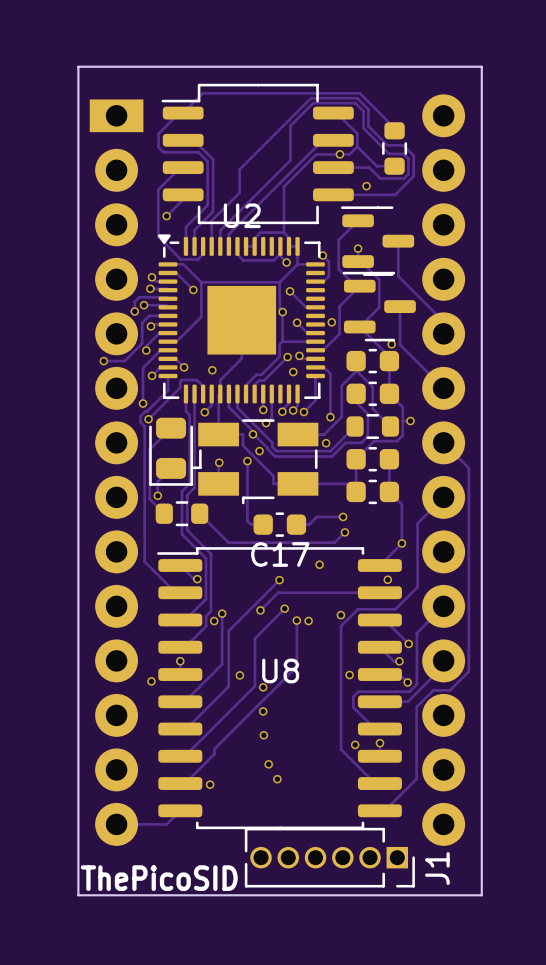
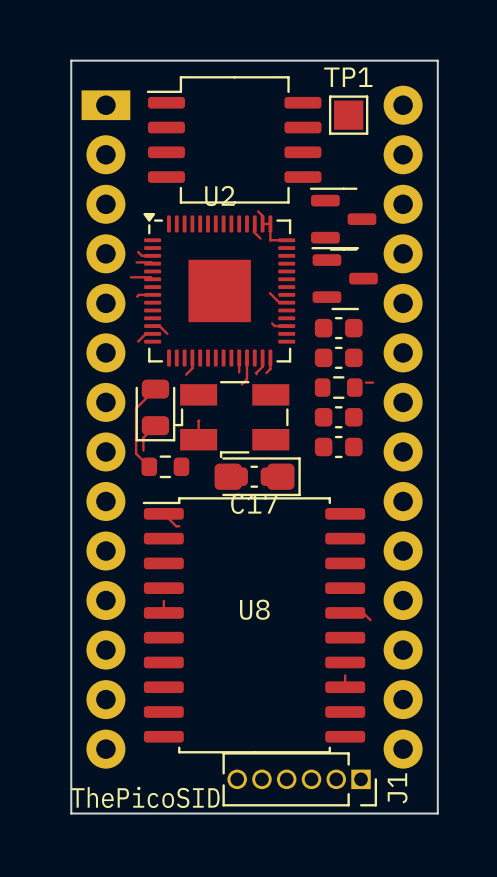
track: (333, 113) (336, 113) (357, 133) (357, 146) -> none
TP1: none -> (348, 115)
track: (394, 130) (394, 128) (359, 93) (202, 93) (158, 133) (158, 147) (163, 152) (198, 152) (207, 161) (207, 205) (185, 227) (185, 246) -> none
track: (183, 140) (194, 140) (213, 159) (213, 211) (194, 230) (194, 246) -> none
track: (333, 140) (322, 140) (228, 234) (228, 246) -> none
track: (357, 146) (349, 154) (316, 154) (283, 186) (283, 232) (260, 232) (254, 238) (254, 246) (246, 246) -> none
track: (357, 146) (376, 166) (394, 166) -> none
part: (394, 148) -> none
via: (339, 154) -> none
track: (183, 167) (180, 167) (158, 189) (158, 236) (180, 259) (197, 259) (203, 254) (203, 246) -> none
track: (333, 167) (369, 167) (380, 178) (404, 178) (408, 174) (408, 158) (403, 153) (389, 153) (363, 128) (363, 111) (355, 103) (313, 103) (290, 125) (290, 160) (220, 230) (220, 246) -> none
via: (366, 186) -> none
track: (183, 194) (183, 199) (166, 216) -> none
track: (333, 194) (395, 194) (413, 176) (413, 155) (403, 145) (387, 145) (368, 126) (368, 109) (357, 98) (310, 98) (239, 169) (239, 192) (211, 220) (211, 246) -> none
via: (166, 216) -> none
track: (358, 220) (338, 240) (338, 269) (357, 288) -> none
track: (398, 241) (398, 276) (443, 321) (443, 333) -> none
track: (237, 246) (237, 254) (243, 260) (273, 260) (280, 253) (280, 246) -> none
track: (358, 248) (358, 261) (361, 261) (379, 279) (379, 307) (359, 326) (389, 356) (389, 393) (402, 407) (402, 435) (397, 441) (374, 441) (356, 459) (356, 491) -> none
via: (358, 248) -> none
track: (322, 255) (328, 261) (328, 276) (323, 281) (315, 281) -> none
via: (322, 255) -> none
via: (286, 262) -> none
track: (167, 264) (183, 264) (201, 282) -> none
track: (297, 264) (279, 282) -> none
track: (167, 273) (176, 273) (193, 289) -> none
via: (151, 277) -> none
track: (201, 282) (279, 282) -> none
track: (201, 282) (201, 316) (176, 341) (167, 341) -> none
track: (279, 282) (279, 295) -> none
track: (359, 286) (339, 306) (339, 333) (323, 350) (315, 350) -> none
via: (150, 288) -> none
via: (193, 289) -> none
track: (290, 291) (306, 307) (315, 307) -> none
via: (290, 291) -> none
track: (279, 295) (279, 309) (282, 312) (282, 341) -> none
track: (167, 298) (139, 297) (134, 301) (134, 311) -> none
via: (144, 305) -> none
track: (400, 306) (400, 344) (443, 388) -> none
via: (134, 311) -> none
via: (282, 312) -> none
track: (167, 315) (149, 315) (142, 322) (142, 343) (124, 361) (103, 361) -> none
track: (241, 320) (241, 358) (220, 380) (218, 434) (243, 434) (243, 445) (273, 476) (273, 483) (356, 483) -> none
via: (297, 322) -> none
via: (331, 322) -> none
via: (150, 326) -> none
track: (167, 333) (159, 333) (147, 345) (146, 350) -> none
track: (282, 341) (315, 341) -> none
track: (282, 341) (279, 344) (279, 356) (261, 374) (256, 374) (246, 385) (246, 393) -> none
via: (391, 344) -> none
via: (146, 350) -> none
track: (167, 350) (160, 350) (143, 367) (143, 403) -> none
via: (299, 355) -> none
track: (287, 357) (264, 380) (259, 380) (254, 385) (254, 393) -> none
via: (287, 357) -> none
via: (103, 361) -> none
via: (184, 367) -> none
track: (315, 367) (324, 367) (330, 373) (330, 417) -> none
via: (212, 370) -> none
track: (356, 370) (372, 386) (372, 408) (390, 426) -> none
track: (356, 370) (341, 385) (341, 416) (324, 434) (298, 434) -> none
via: (293, 371) -> none
via: (152, 375) -> none
track: (167, 376) (167, 390) (140, 416) (140, 422) (144, 426) (144, 561) (175, 592) (180, 592) -> none
track: (315, 376) (315, 400) (303, 412) -> none
track: (185, 393) (185, 411) (189, 414) (189, 483) (182, 491) (182, 534) (205, 558) (205, 599) (185, 620) (180, 620) -> none
track: (194, 393) (194, 487) (187, 495) (187, 530) (210, 553) (210, 611) (206, 616) (206, 626) (185, 647) (180, 647) -> none
track: (203, 393) (203, 386) (196, 380) (181, 380) (180, 387) (148, 419) -> none
track: (237, 393) (237, 407) (272, 442) (272, 446) (276, 451) (330, 451) (355, 426) -> none
track: (356, 393) (356, 402) (367, 413) (367, 436) (361, 442) (345, 442) (331, 456) (275, 456) (228, 407) (228, 393) -> none
via: (143, 403) -> none
via: (263, 409) -> none
via: (293, 410) -> none
via: (282, 411) -> none
via: (204, 412) -> none
via: (303, 412) -> none
via: (330, 417) -> none
via: (148, 419) -> none
via: (410, 421) -> none
via: (266, 423) -> none
via: (253, 434) -> none
track: (443, 442) (468, 468) (468, 671) (449, 690) (433, 690) (416, 707) (416, 778) (384, 810) (379, 810) -> none
via: (326, 443) -> none
via: (259, 451) -> none
track: (389, 459) (389, 491) (401, 504) (401, 543) (379, 565) -> none
track: (247, 461) (247, 520) (251, 524) (263, 524) -> none
via: (247, 461) -> none
via: (219, 462) -> none
via: (157, 495) -> none
track: (443, 497) (417, 523) (417, 587) (395, 609) (358, 609) (341, 626) (341, 749) (375, 783) (379, 783) -> none
track: (199, 513) (228, 542) (334, 542) (344, 532) -> none
track: (343, 516) (316, 516) (309, 524) (296, 524) -> none
via: (343, 516) -> none
part: none -> (257, 476)
via: (344, 532) -> none
via: (401, 543) -> none
via: (319, 564) -> none
via: (197, 579) -> none
via: (387, 579) -> none
track: (279, 580) (228, 630) (228, 686) (186, 729) (180, 729) -> none
via: (279, 580) -> none
track: (379, 592) (278, 592) (260, 610) -> none
track: (443, 606) (416, 633) (416, 684) (409, 691) (358, 691) (353, 696) (353, 707) (375, 729) (379, 729) -> none
track: (284, 608) (254, 638) (254, 686) (184, 756) (180, 756) -> none
via: (284, 608) -> none
via: (260, 610) -> none
track: (222, 613) (222, 664) (184, 701) (180, 701) -> none
via: (222, 613) -> none
via: (340, 615) -> none
track: (296, 620) (296, 666) (214, 749) (214, 754) (185, 783) (180, 783) -> none
via: (296, 620) -> none
via: (308, 620) -> none
track: (379, 620) (384, 620) (408, 643) -> none
via: (214, 621) -> none
via: (408, 643) -> none
track: (379, 647) (394, 661) (399, 661) -> none
track: (443, 660) (443, 666) (407, 701) (379, 701) -> none
via: (180, 661) -> none
via: (399, 661) -> none
via: (239, 675) -> none
via: (349, 675) -> none
via: (151, 681) -> none
via: (407, 682) -> none
via: (263, 687) -> none
via: (263, 711) -> none
via: (263, 735) -> none
via: (379, 743) -> none
via: (355, 744) -> none
via: (268, 764) -> none
via: (277, 779) -> none
via: (210, 784) -> none
track: (180, 810) (166, 824) (116, 824) -> none

